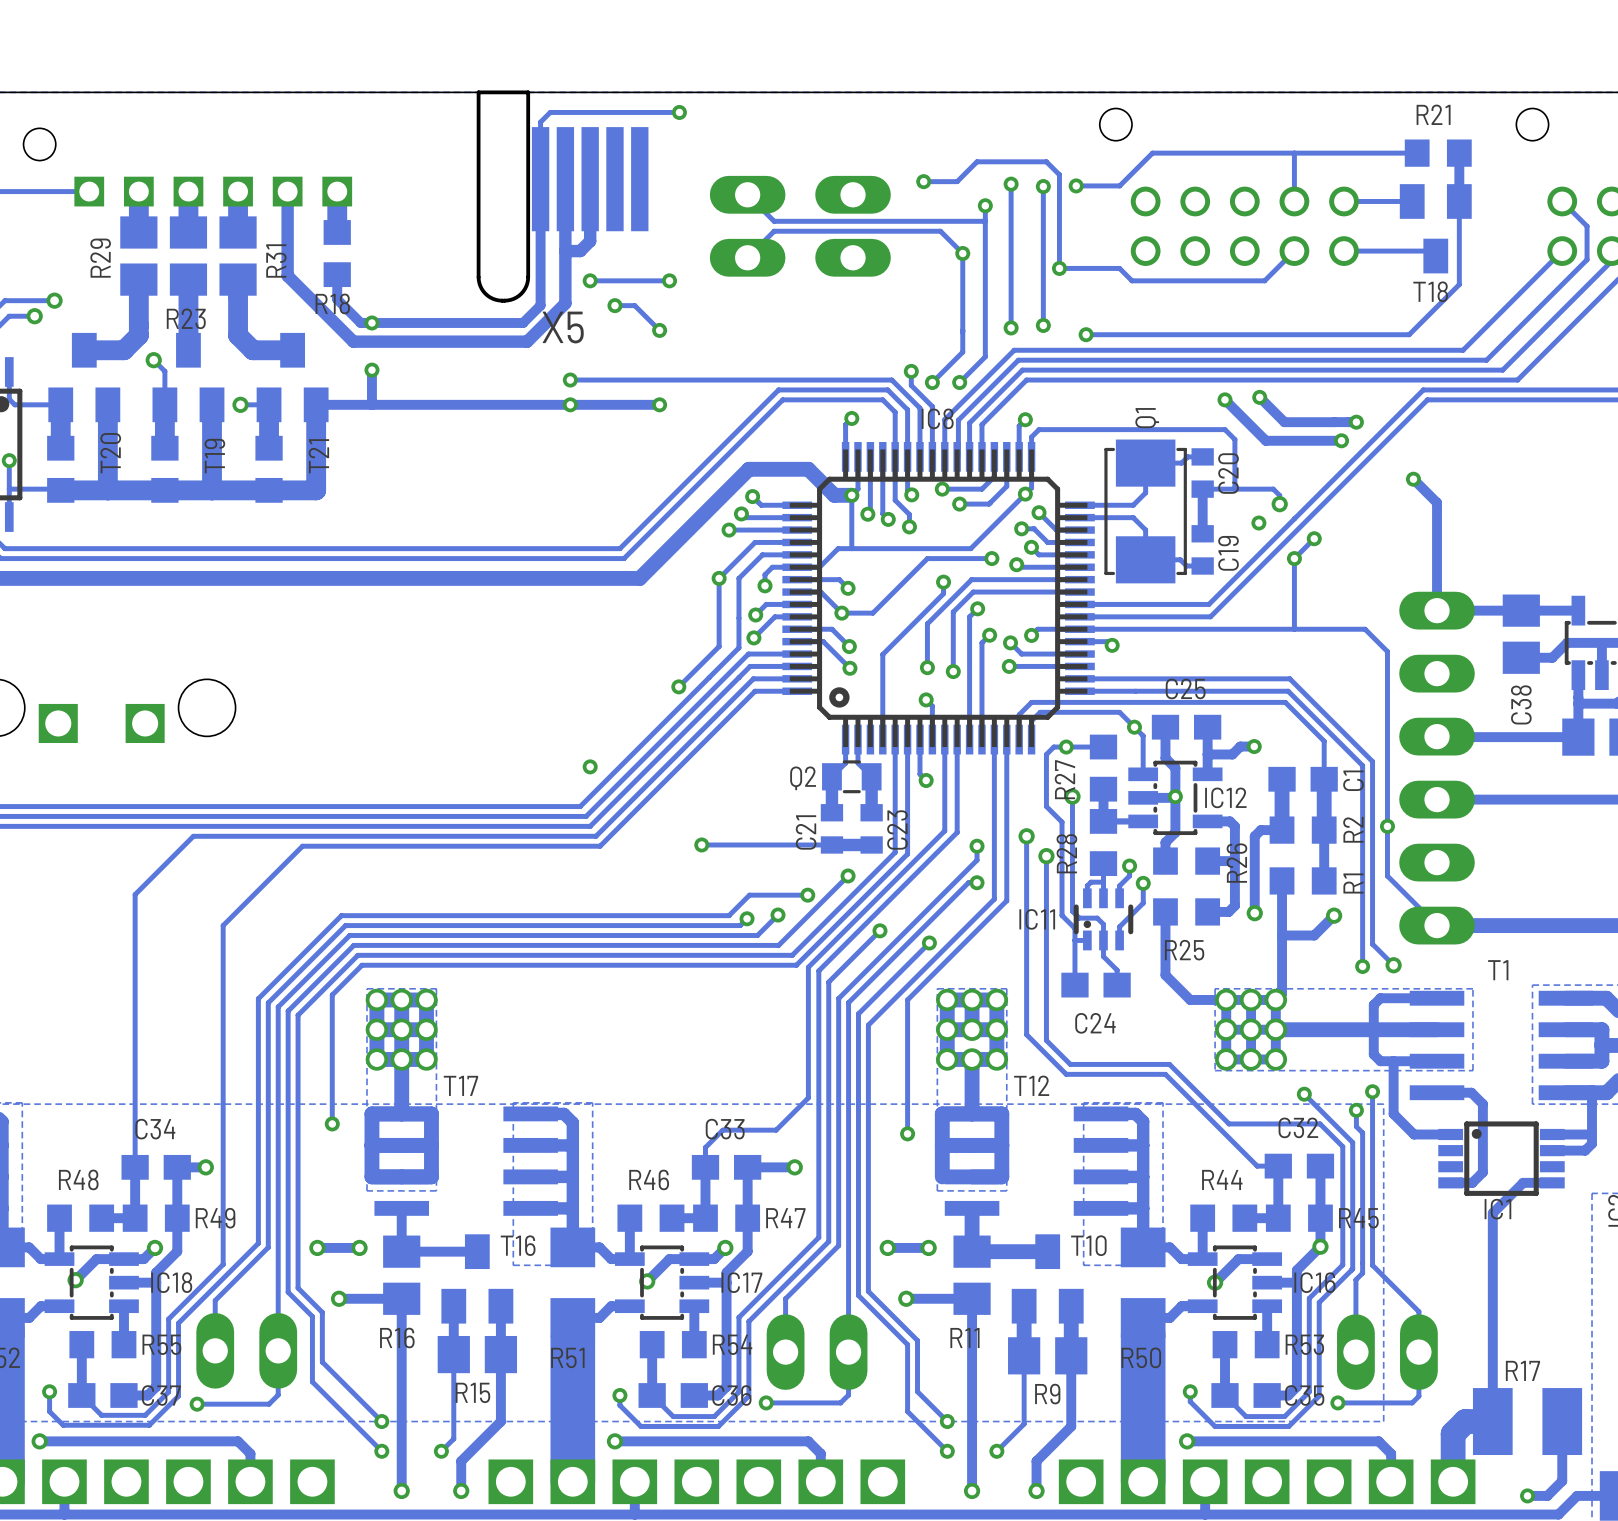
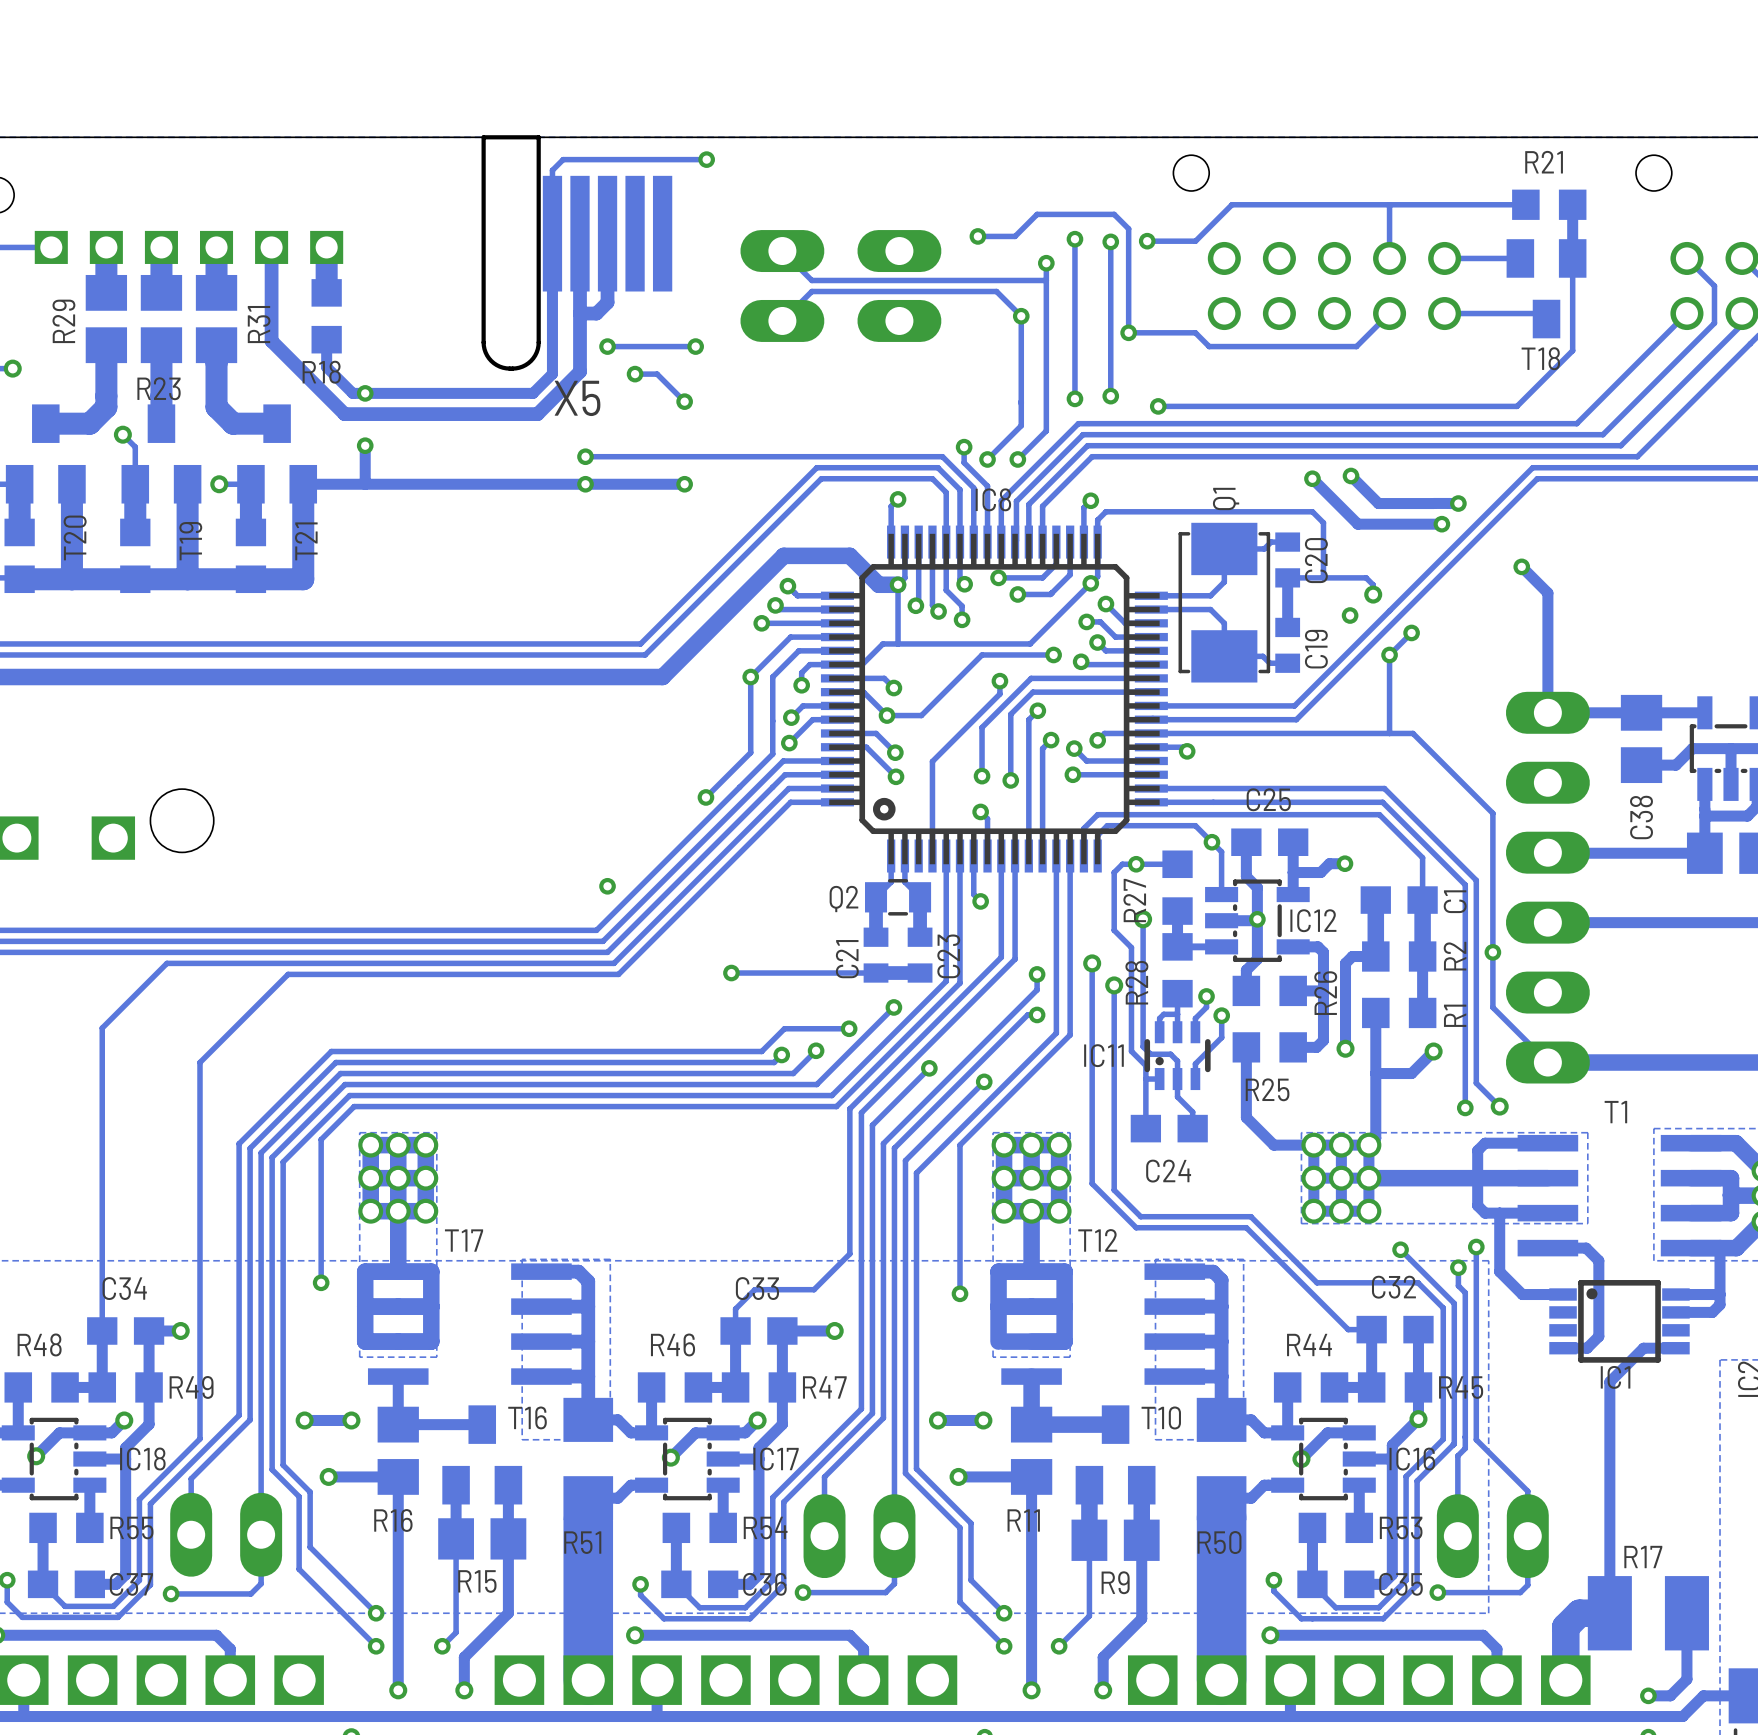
track: (1315, 629) (1365, 629) (1387, 651) (1387, 701) -> (1412, 733) (1492, 813)

